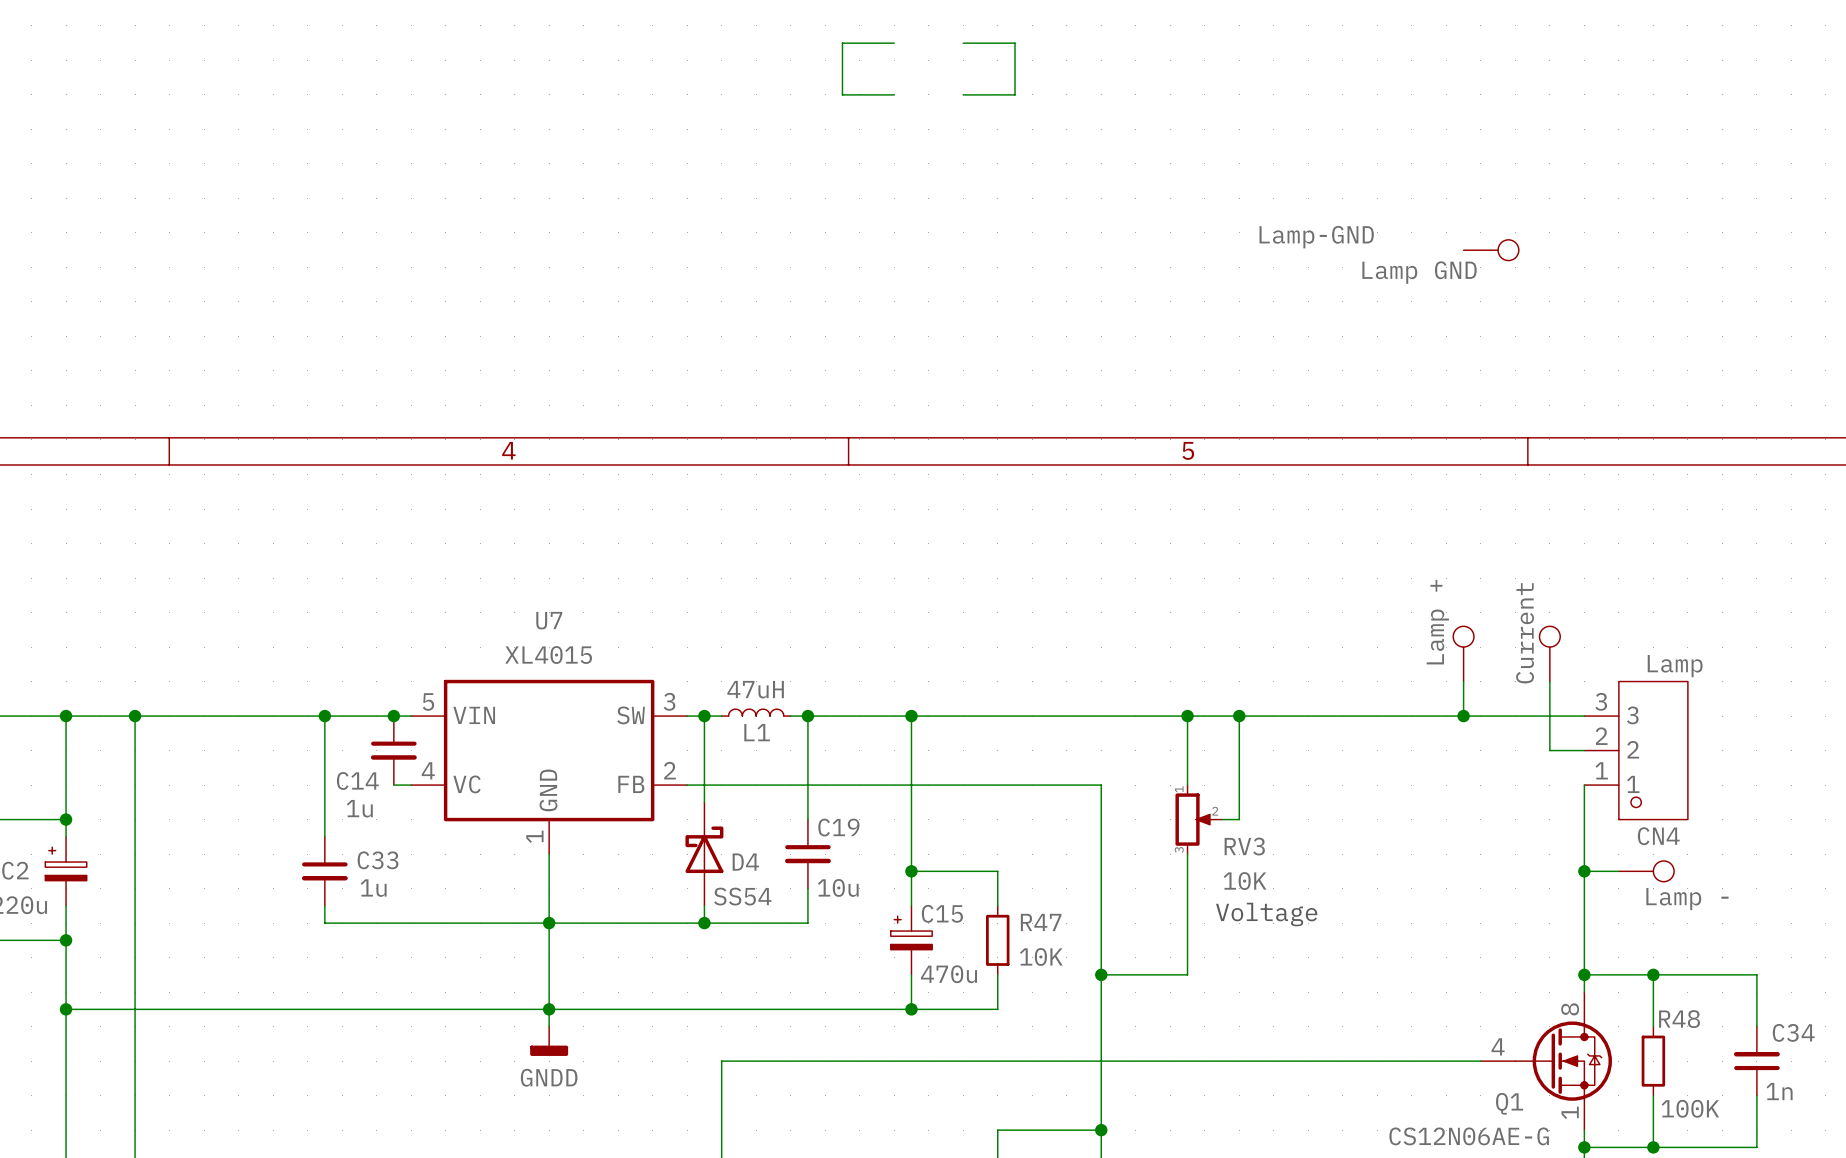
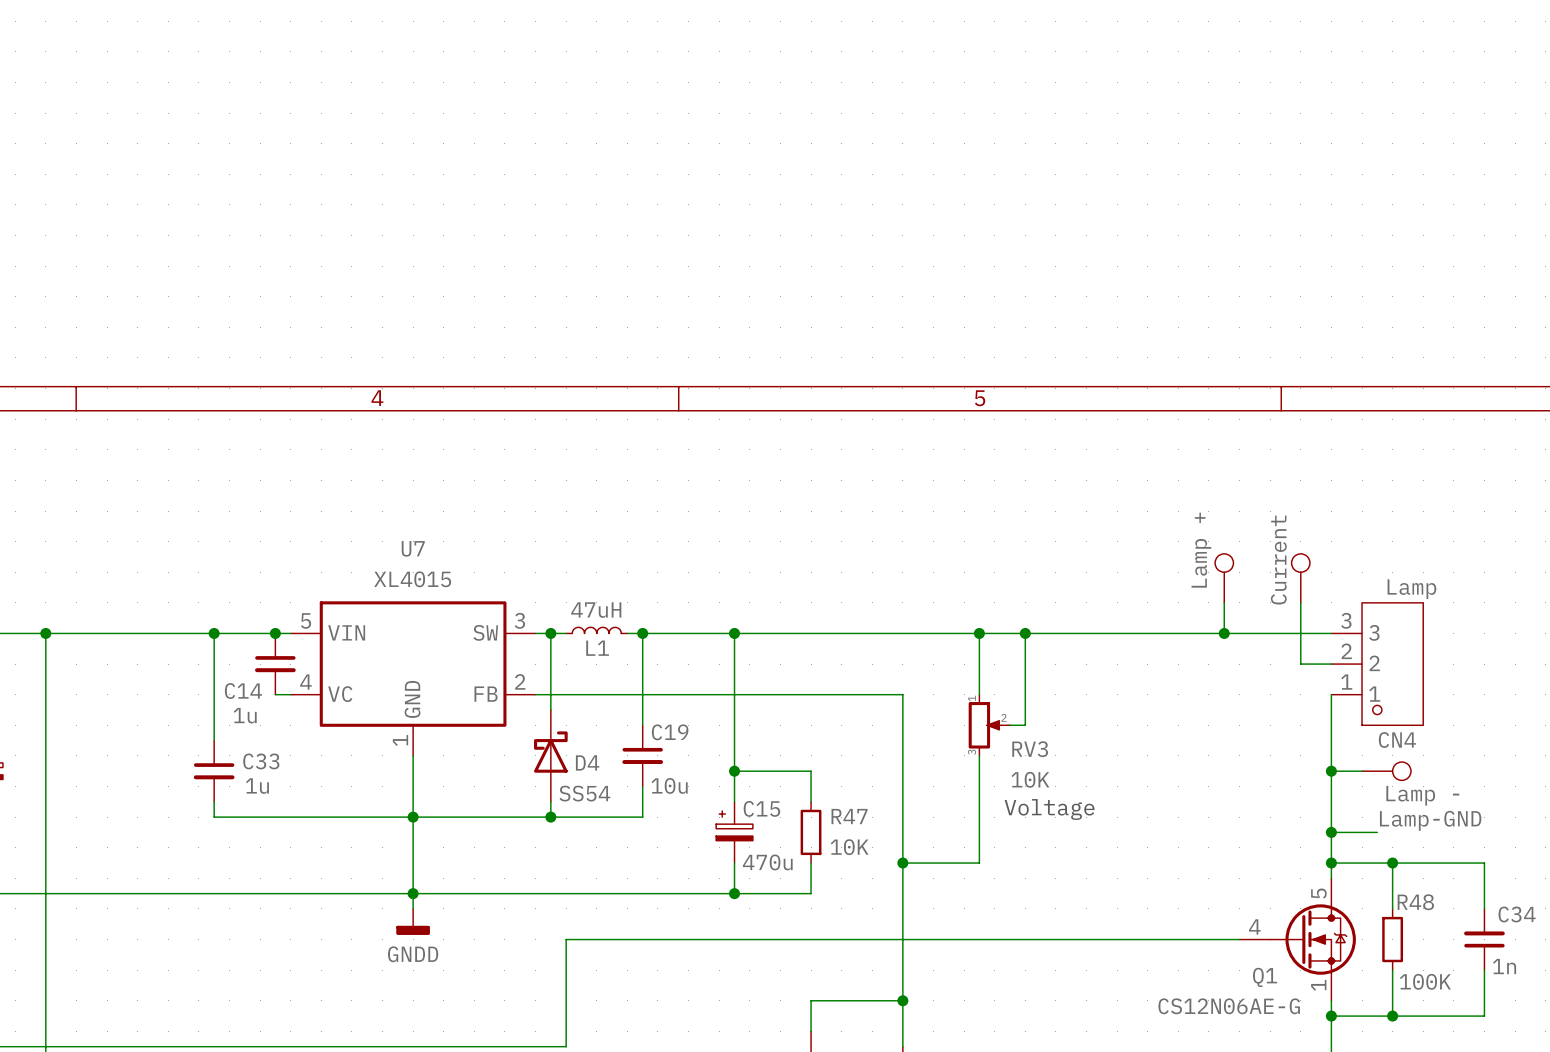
wire: (894, 43) (842, 43) (842, 94) (894, 94) -> none
wire: (963, 43) (1015, 43) (1015, 94) (963, 94) -> none
label: Lamp-GND (1316, 237) -> none
part: (1491, 250) -> none
label: none -> Lamp-GND (1430, 820)
wire: none -> (1331, 832) (1377, 832)
junction: none -> (1331, 832)
Q1 pin number: 8 (1570, 1009) -> 5 (1318, 893)

